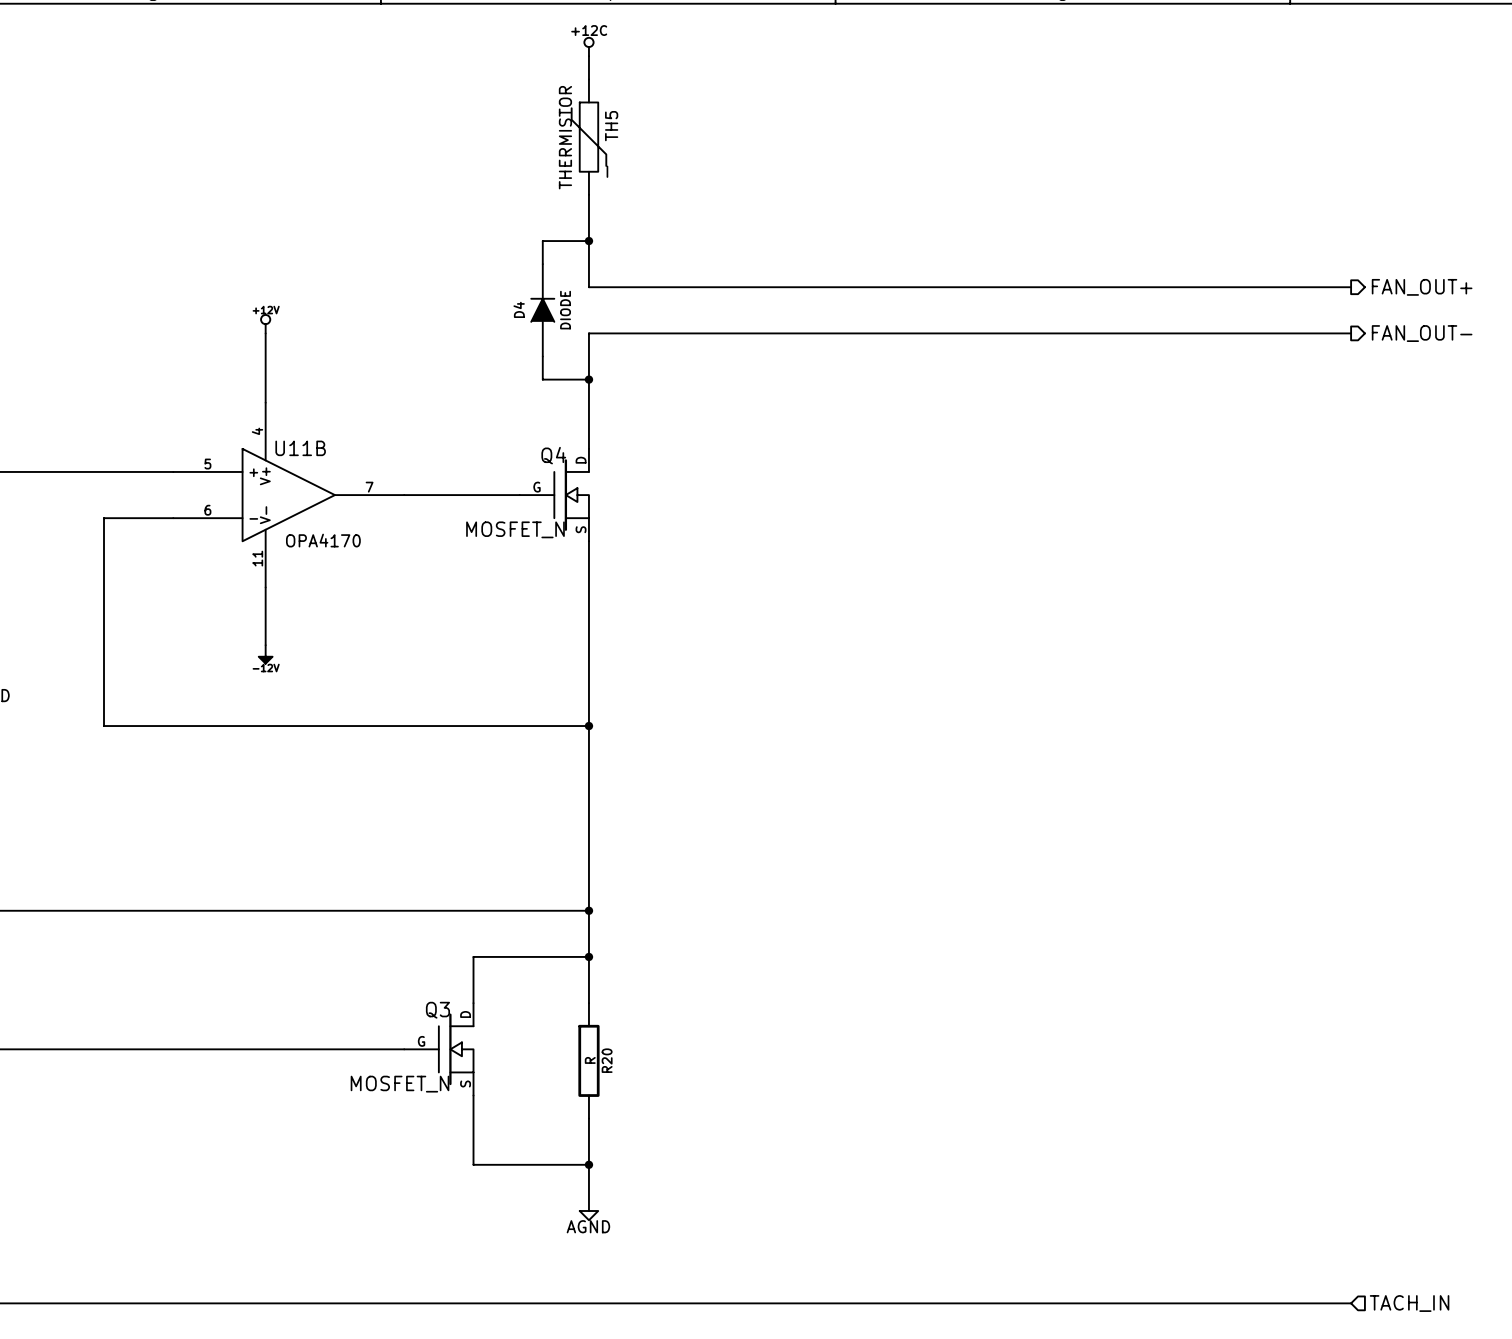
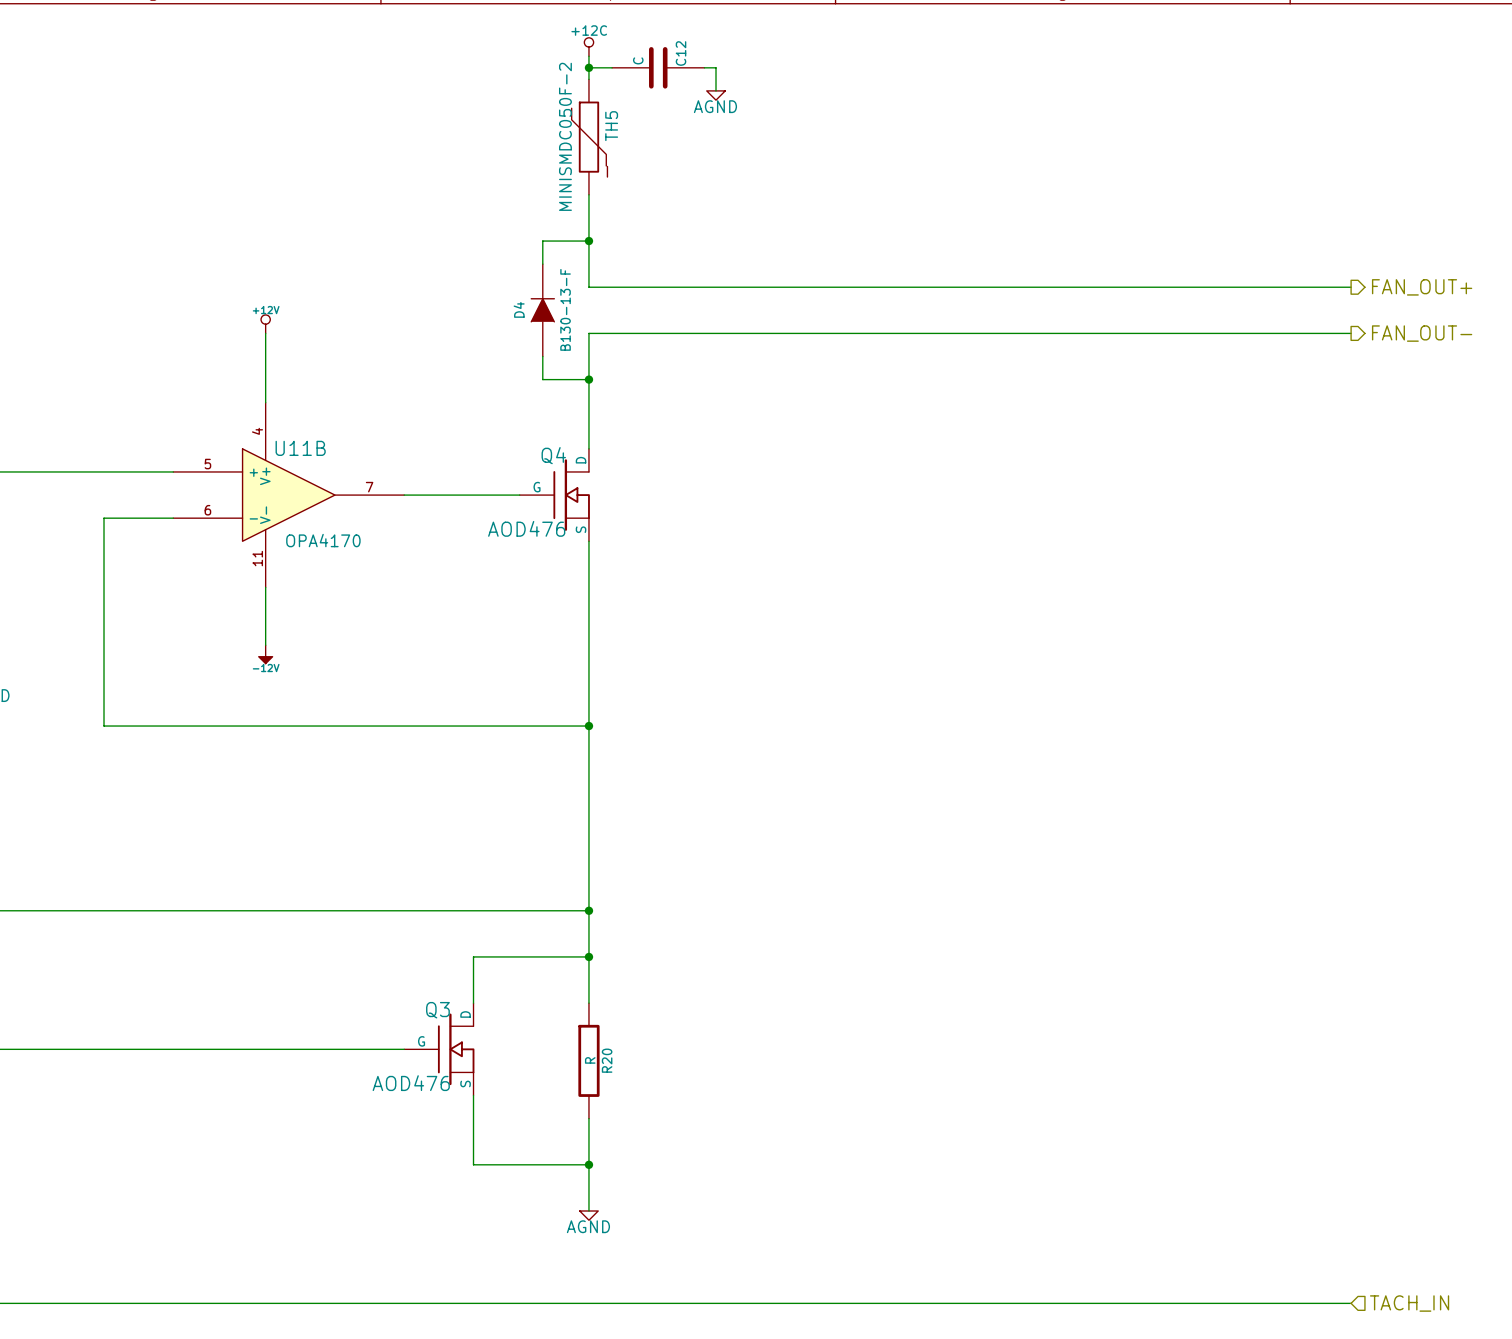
wire: none -> (588, 67) (612, 67)
junction: none -> (588, 67)
C12: none -> C (658, 67)
wire: none -> (704, 67) (716, 67) (716, 90)
power symbol: none -> AGND (716, 95)
TH5 value: THERMISTOR (565, 137) -> MINISMDC050F-2 (565, 136)
D4 value: DIODE (565, 310) -> B130-13-F (565, 309)
Q4 value: MOSFET_N (515, 529) -> AOD476 (526, 528)
Q3 value: MOSFET_N (400, 1084) -> AOD476 (411, 1083)

